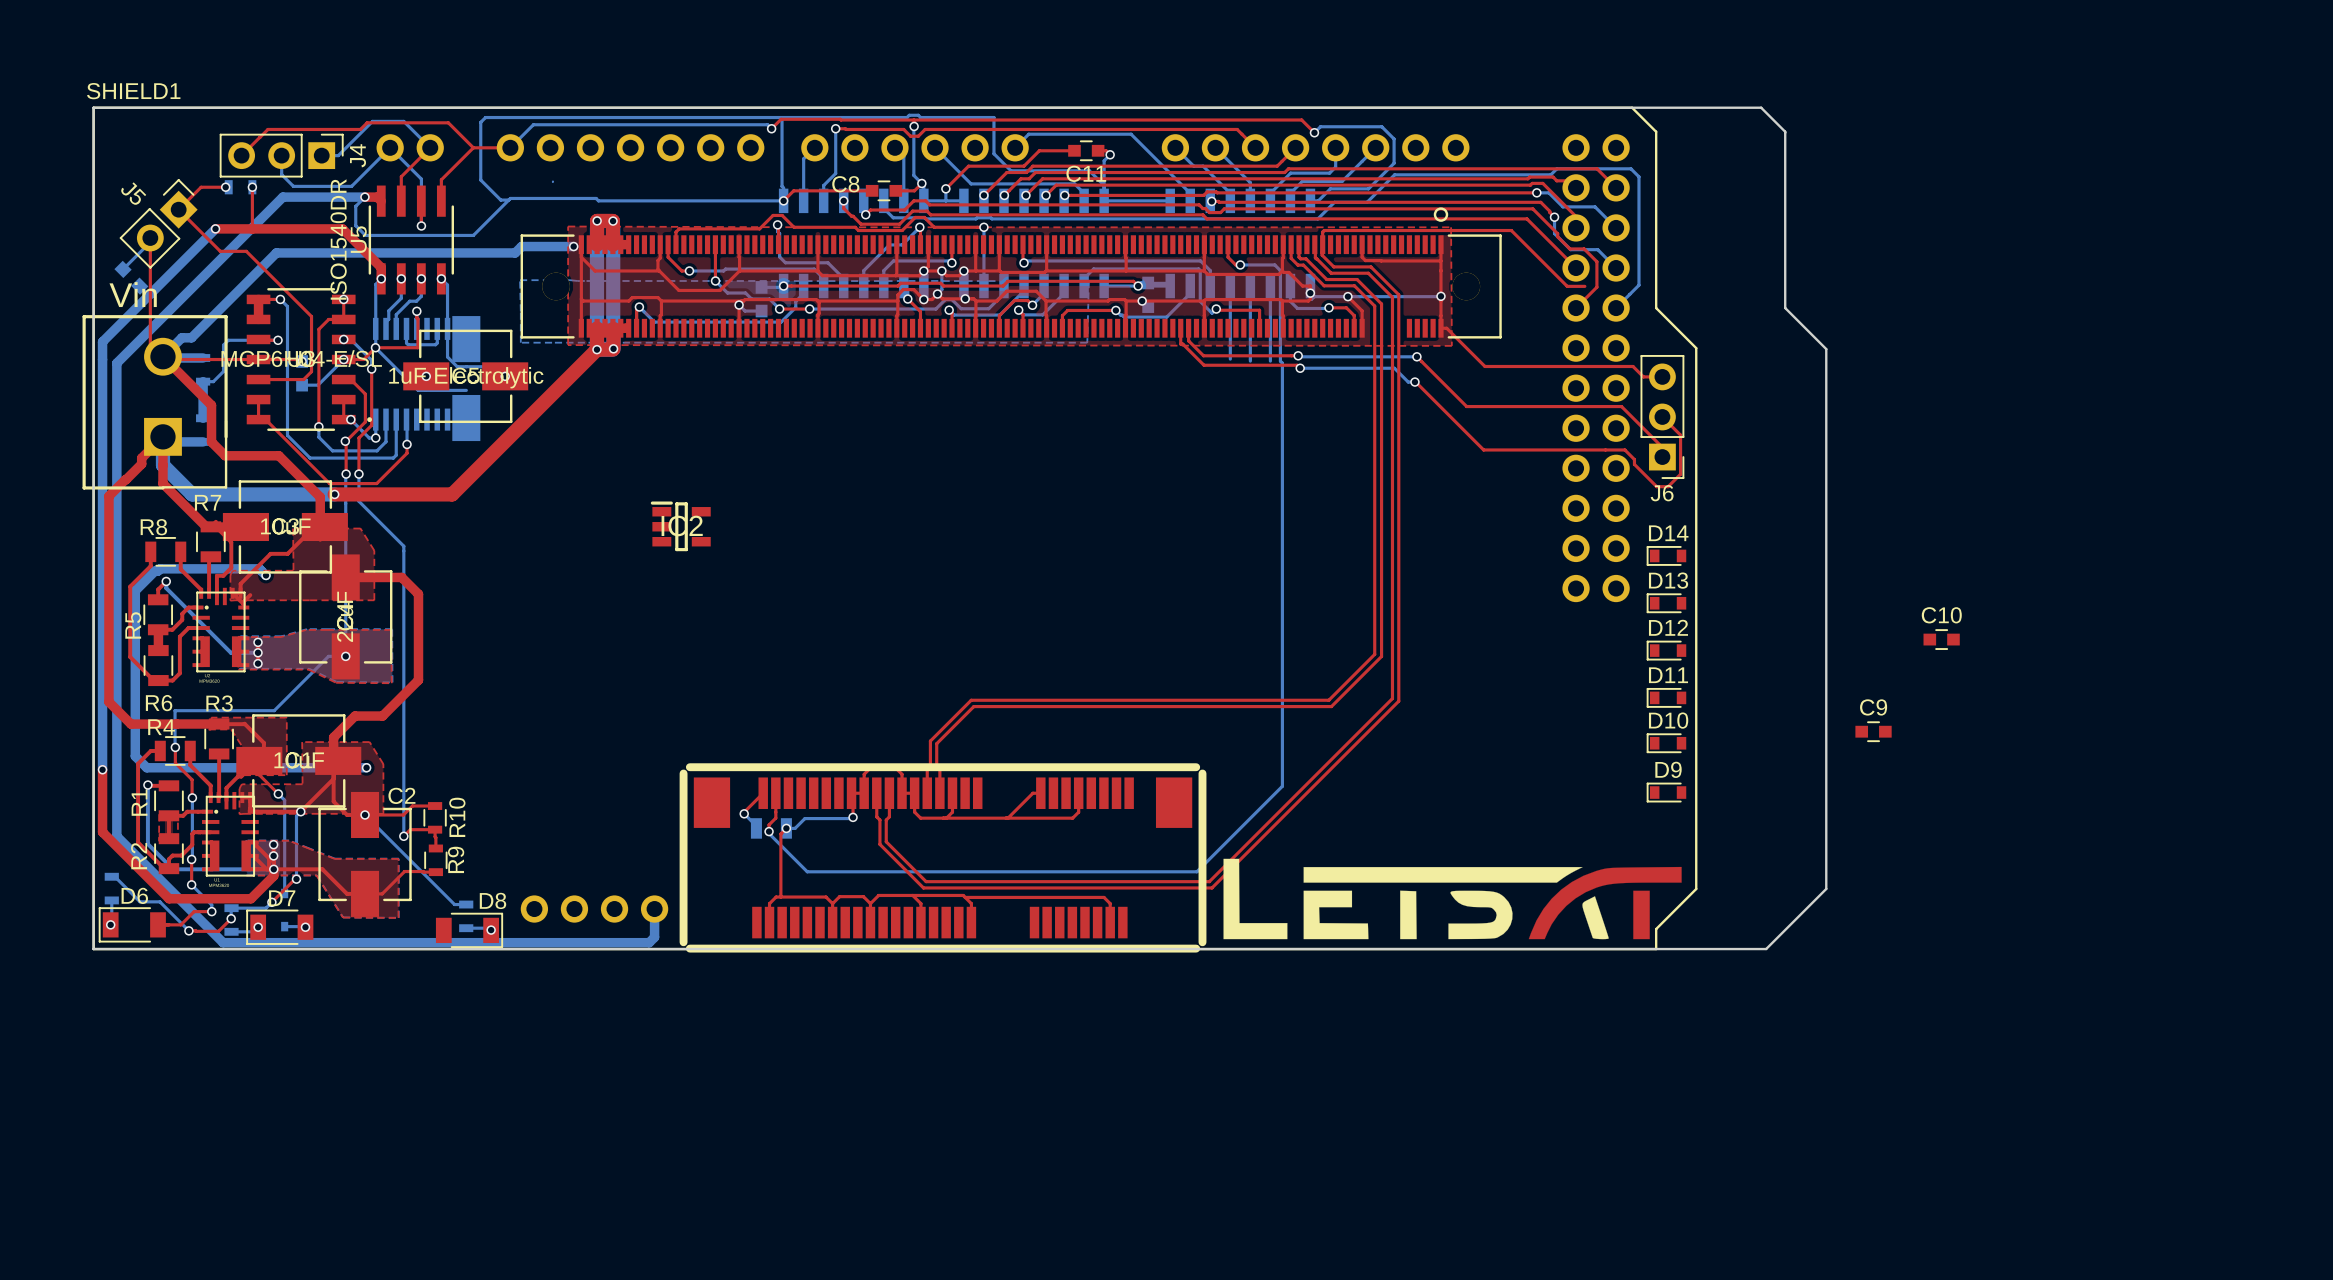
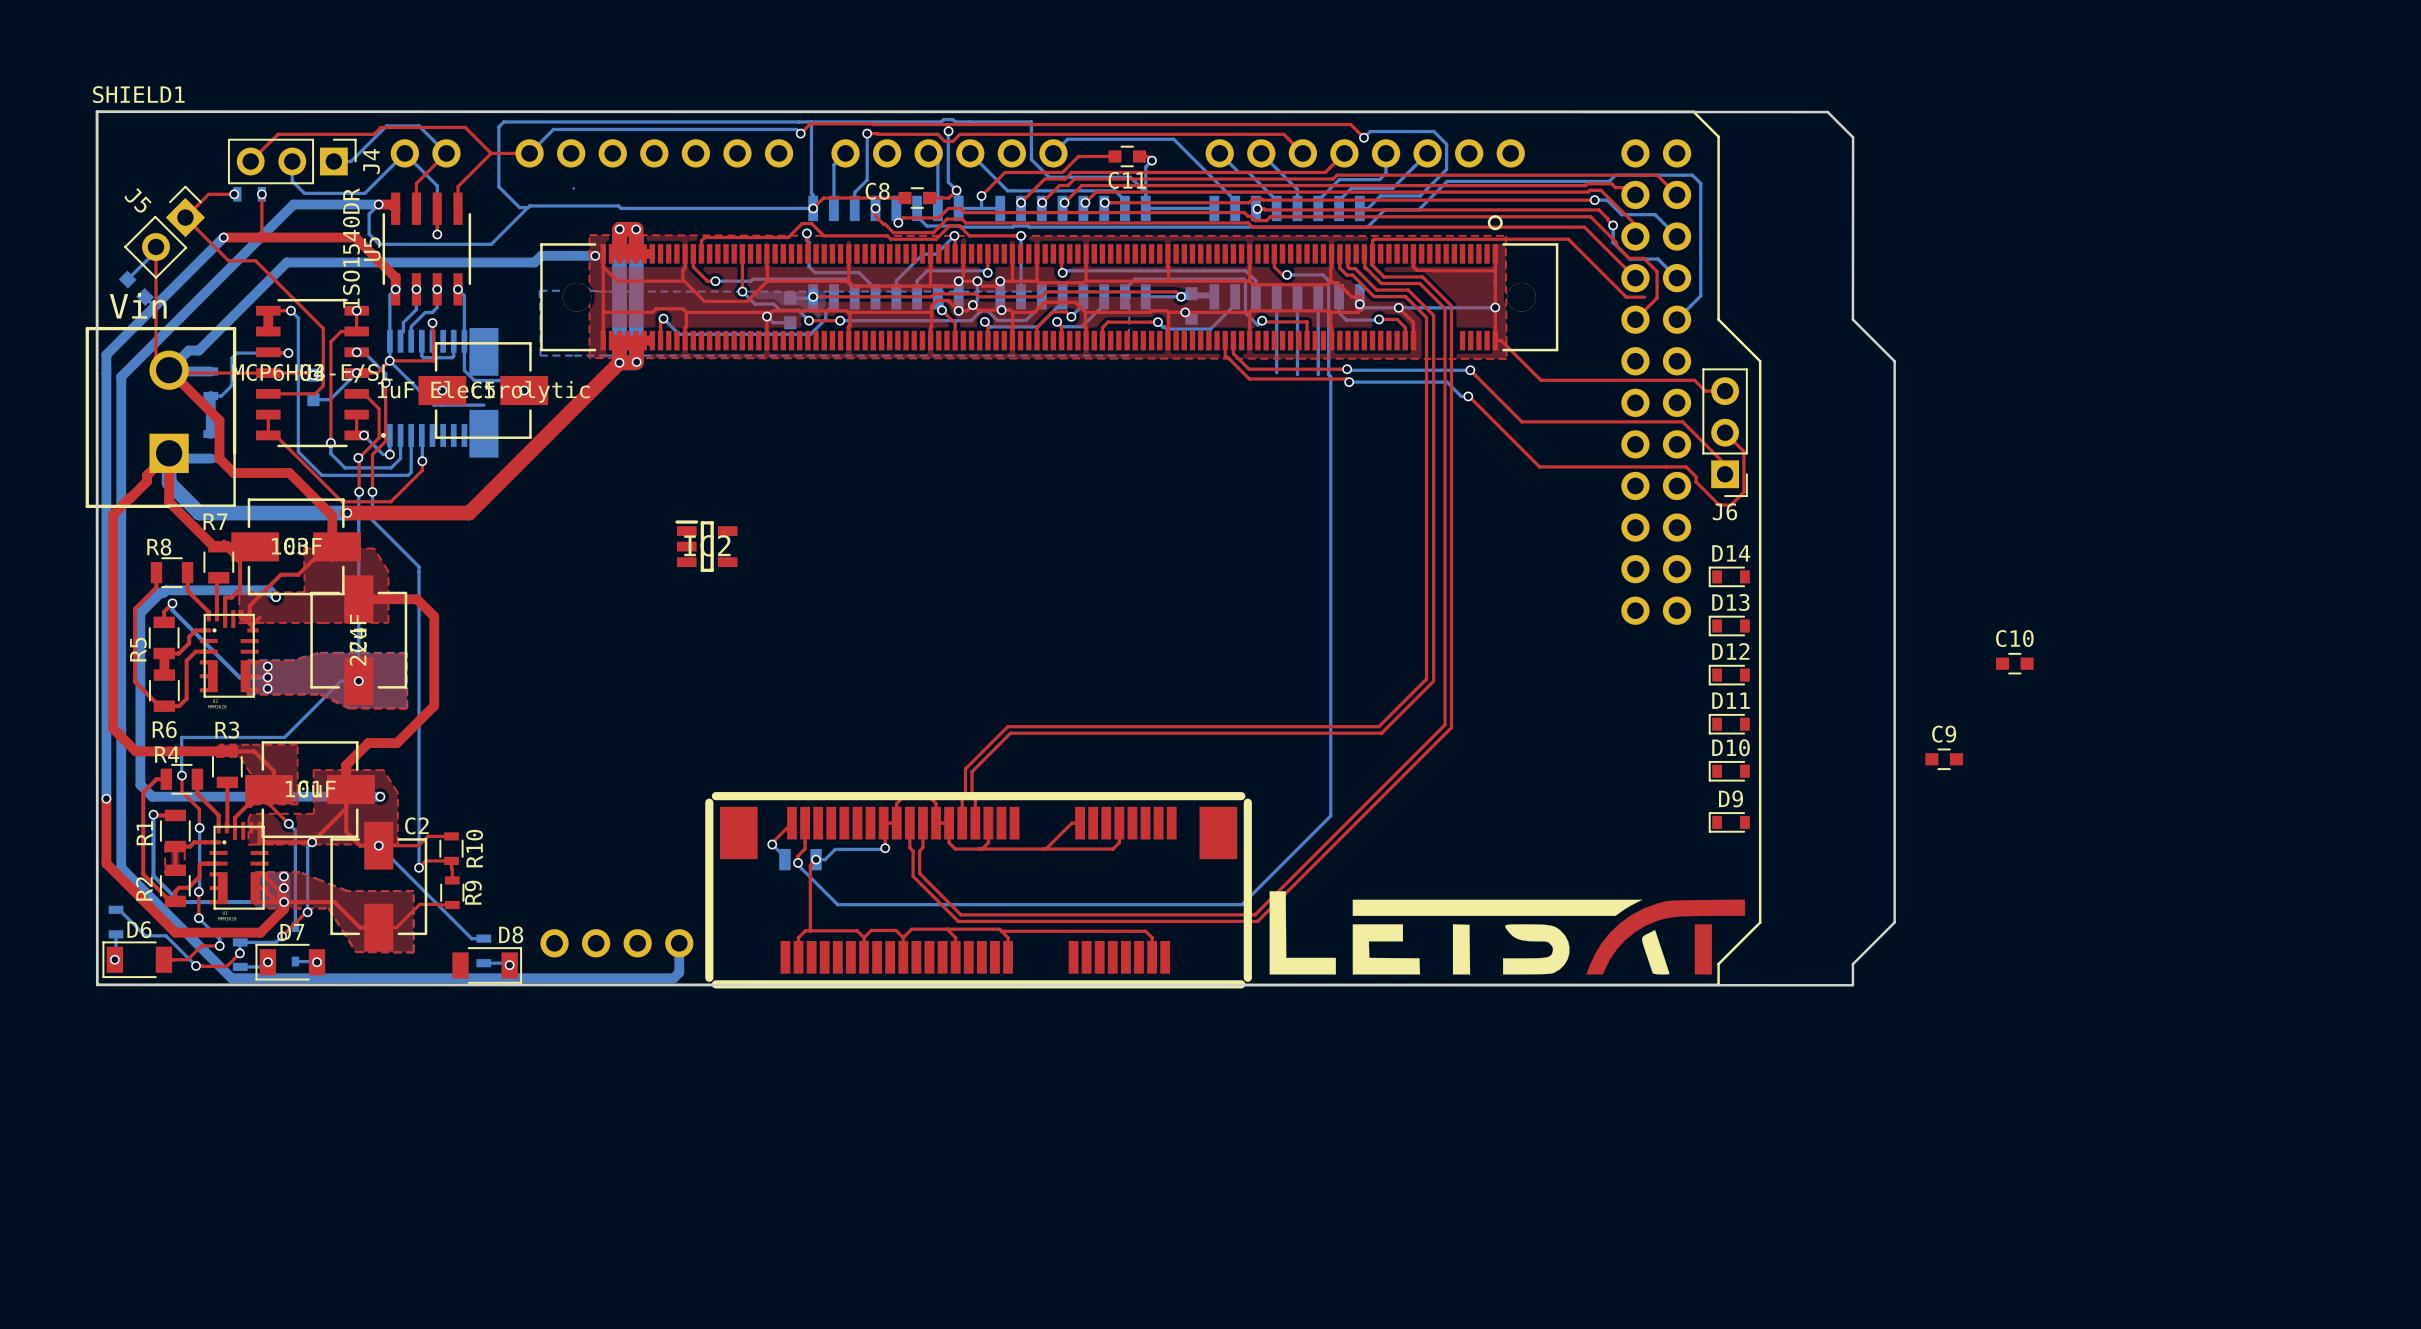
board edge: (93, 107) (93, 949) (1766, 949) (1826, 888) (1826, 349) (1785, 308) (1785, 131) (1761, 107) (93, 107) -> (96, 111) (1827, 112)
board edge: none -> (96, 111) (97, 984) (1852, 985)
board edge: none -> (1827, 112) (1853, 137) (1852, 319) (1894, 361) (1894, 922) (1852, 964) (1852, 984)

